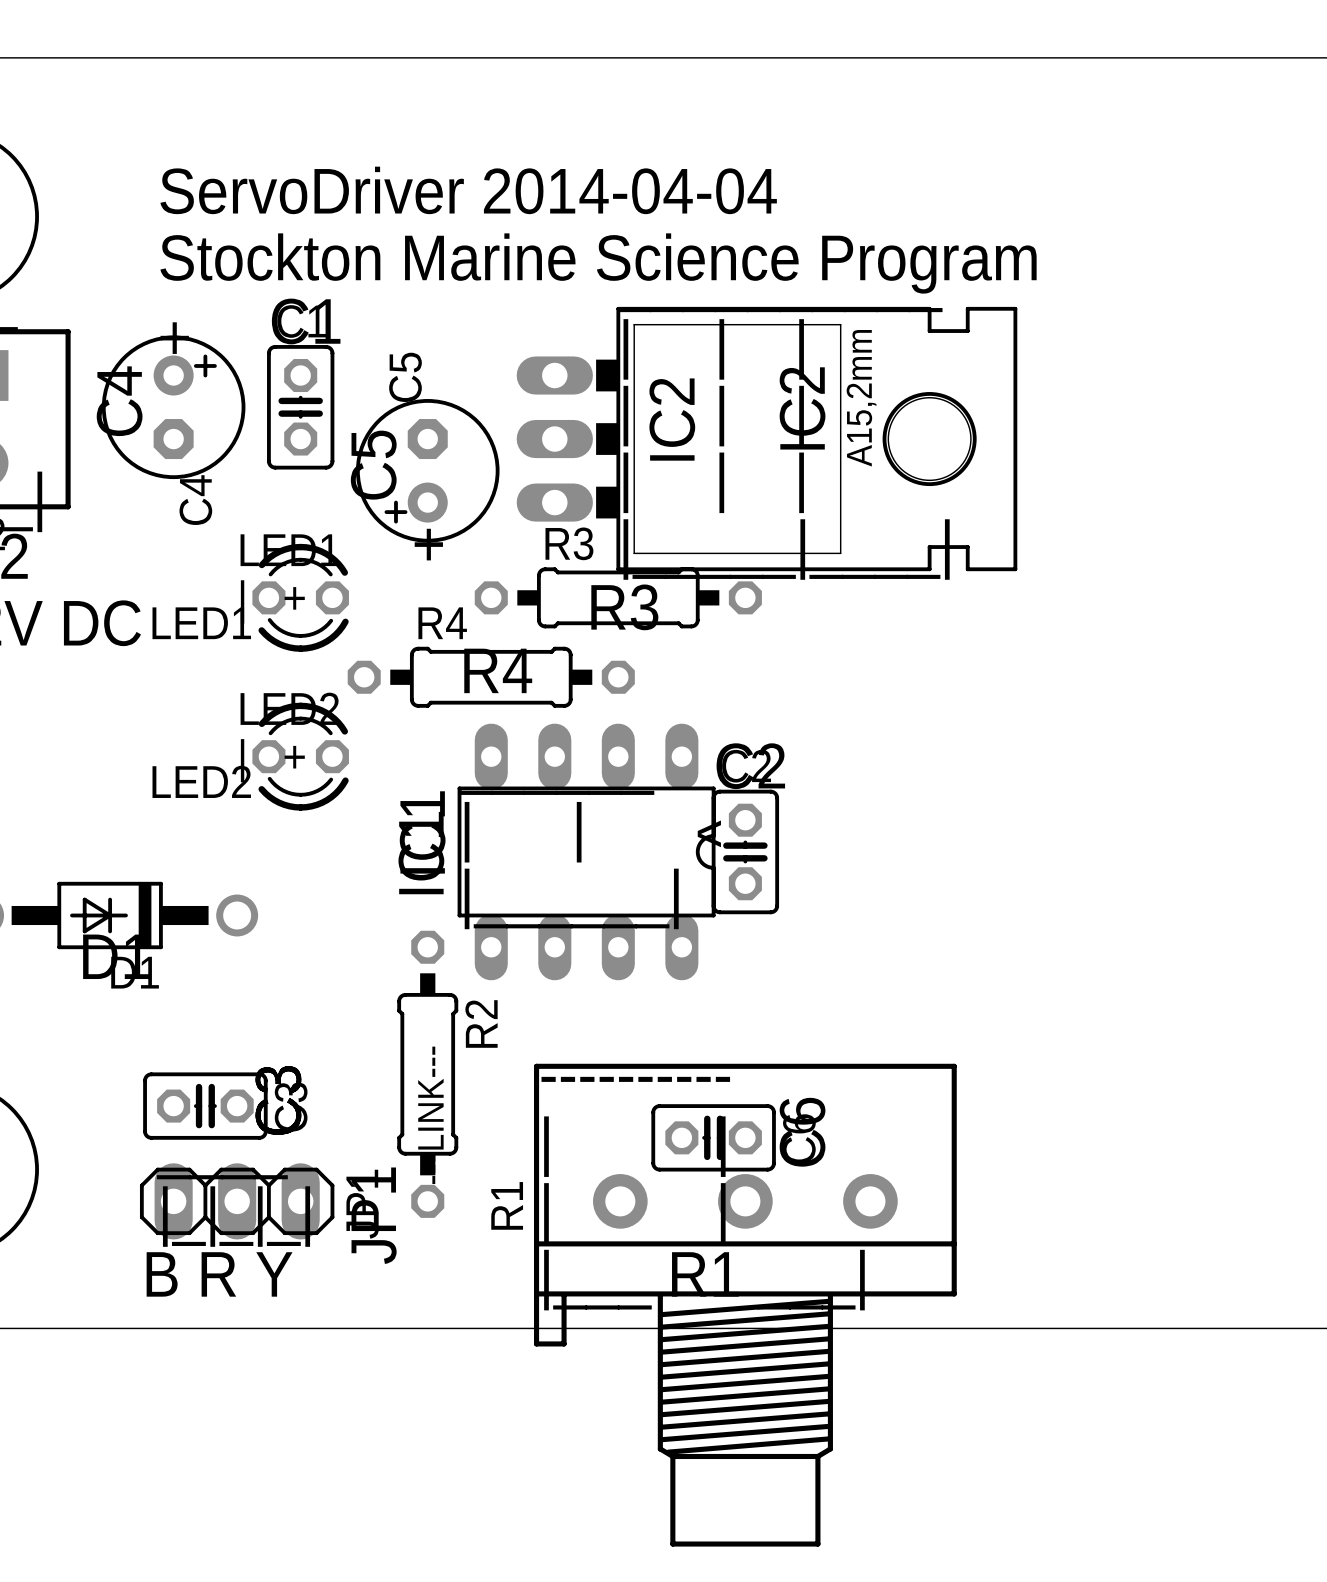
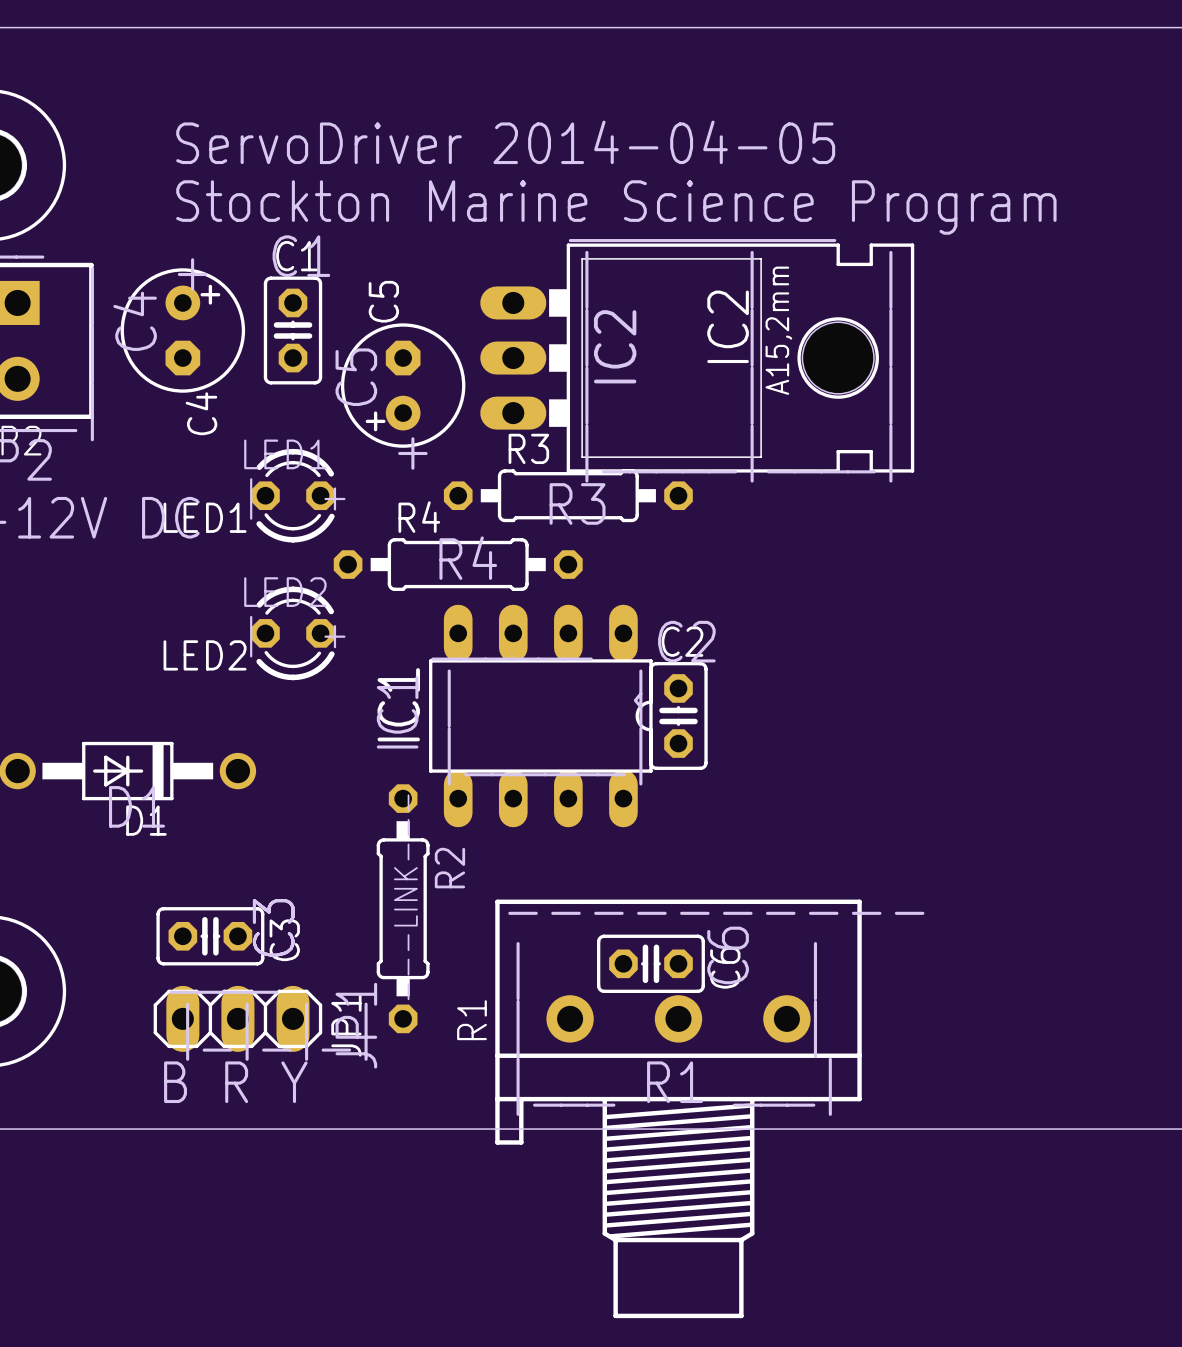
text: ServoDriver 2014-04-04 (468, 190) -> ServoDriver 2014-04-05 (505, 142)

